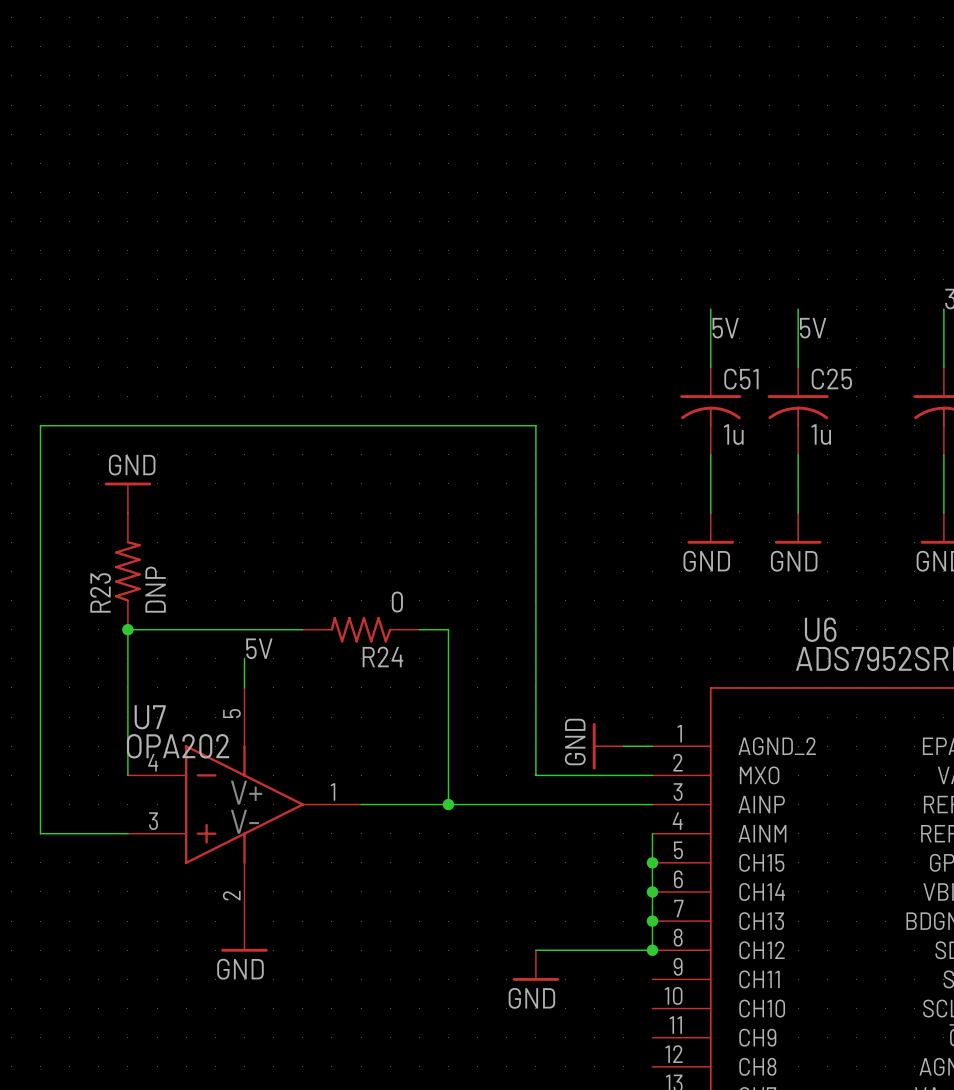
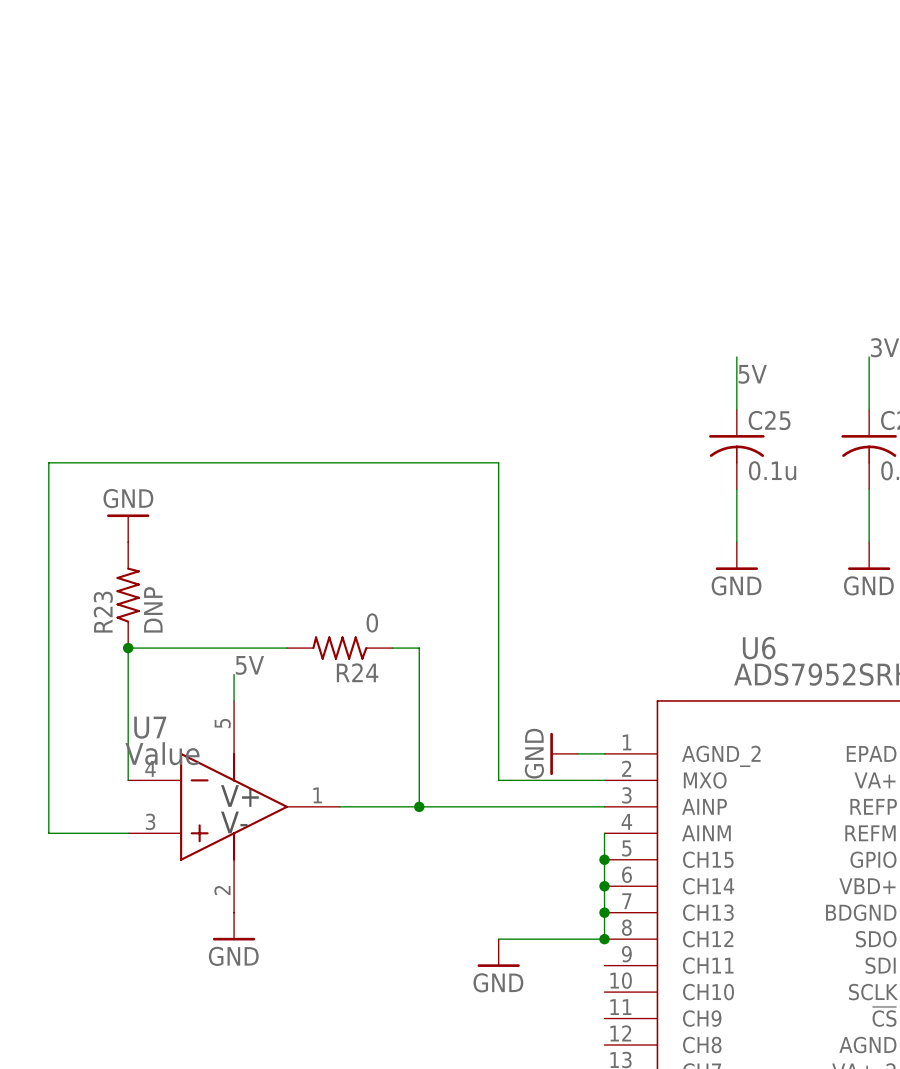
wire: (710, 309) (710, 367) -> none
label: 5V (725, 328) -> none
C51: 1u (710, 411) -> none
C25 value: 1u (821, 434) -> 0.1u (772, 470)
wire: (710, 454) (710, 513) -> none
power symbol: GND (710, 528) -> none
U7 value: OPA202 (178, 746) -> Value (162, 753)

